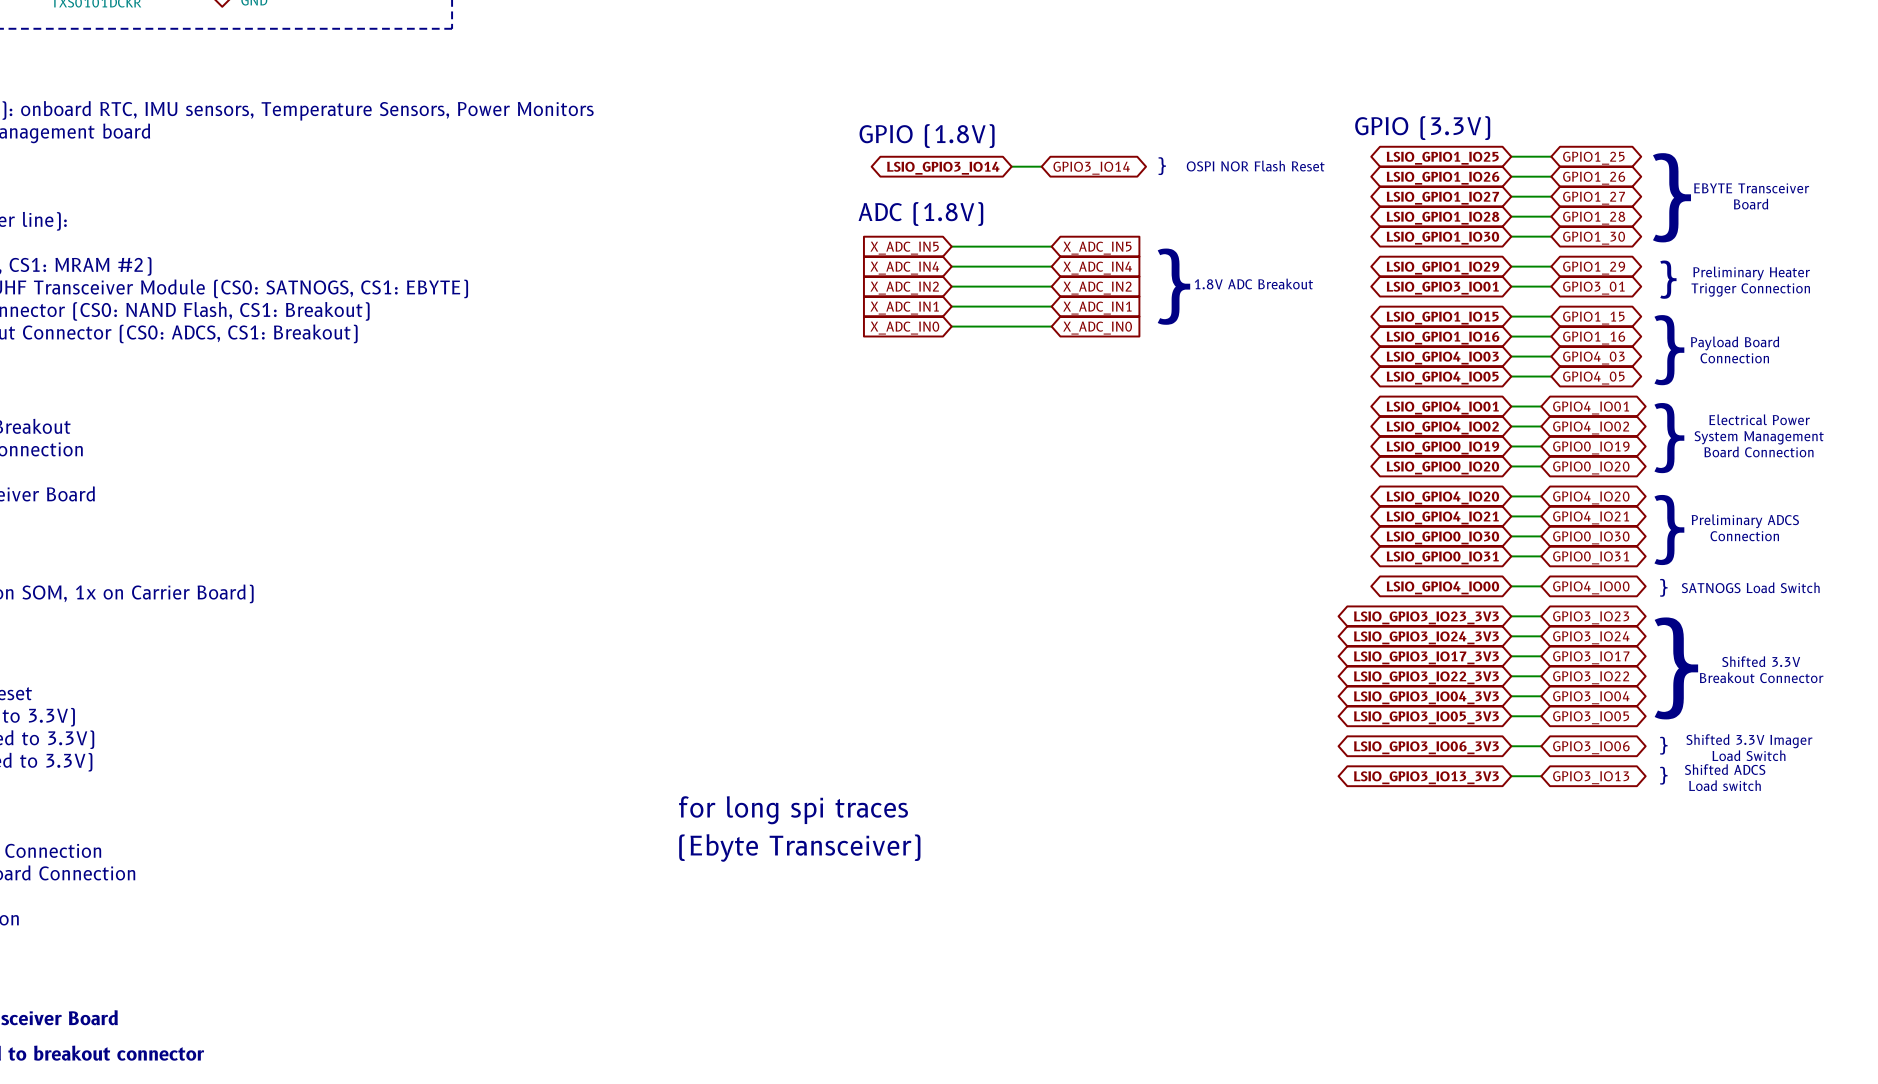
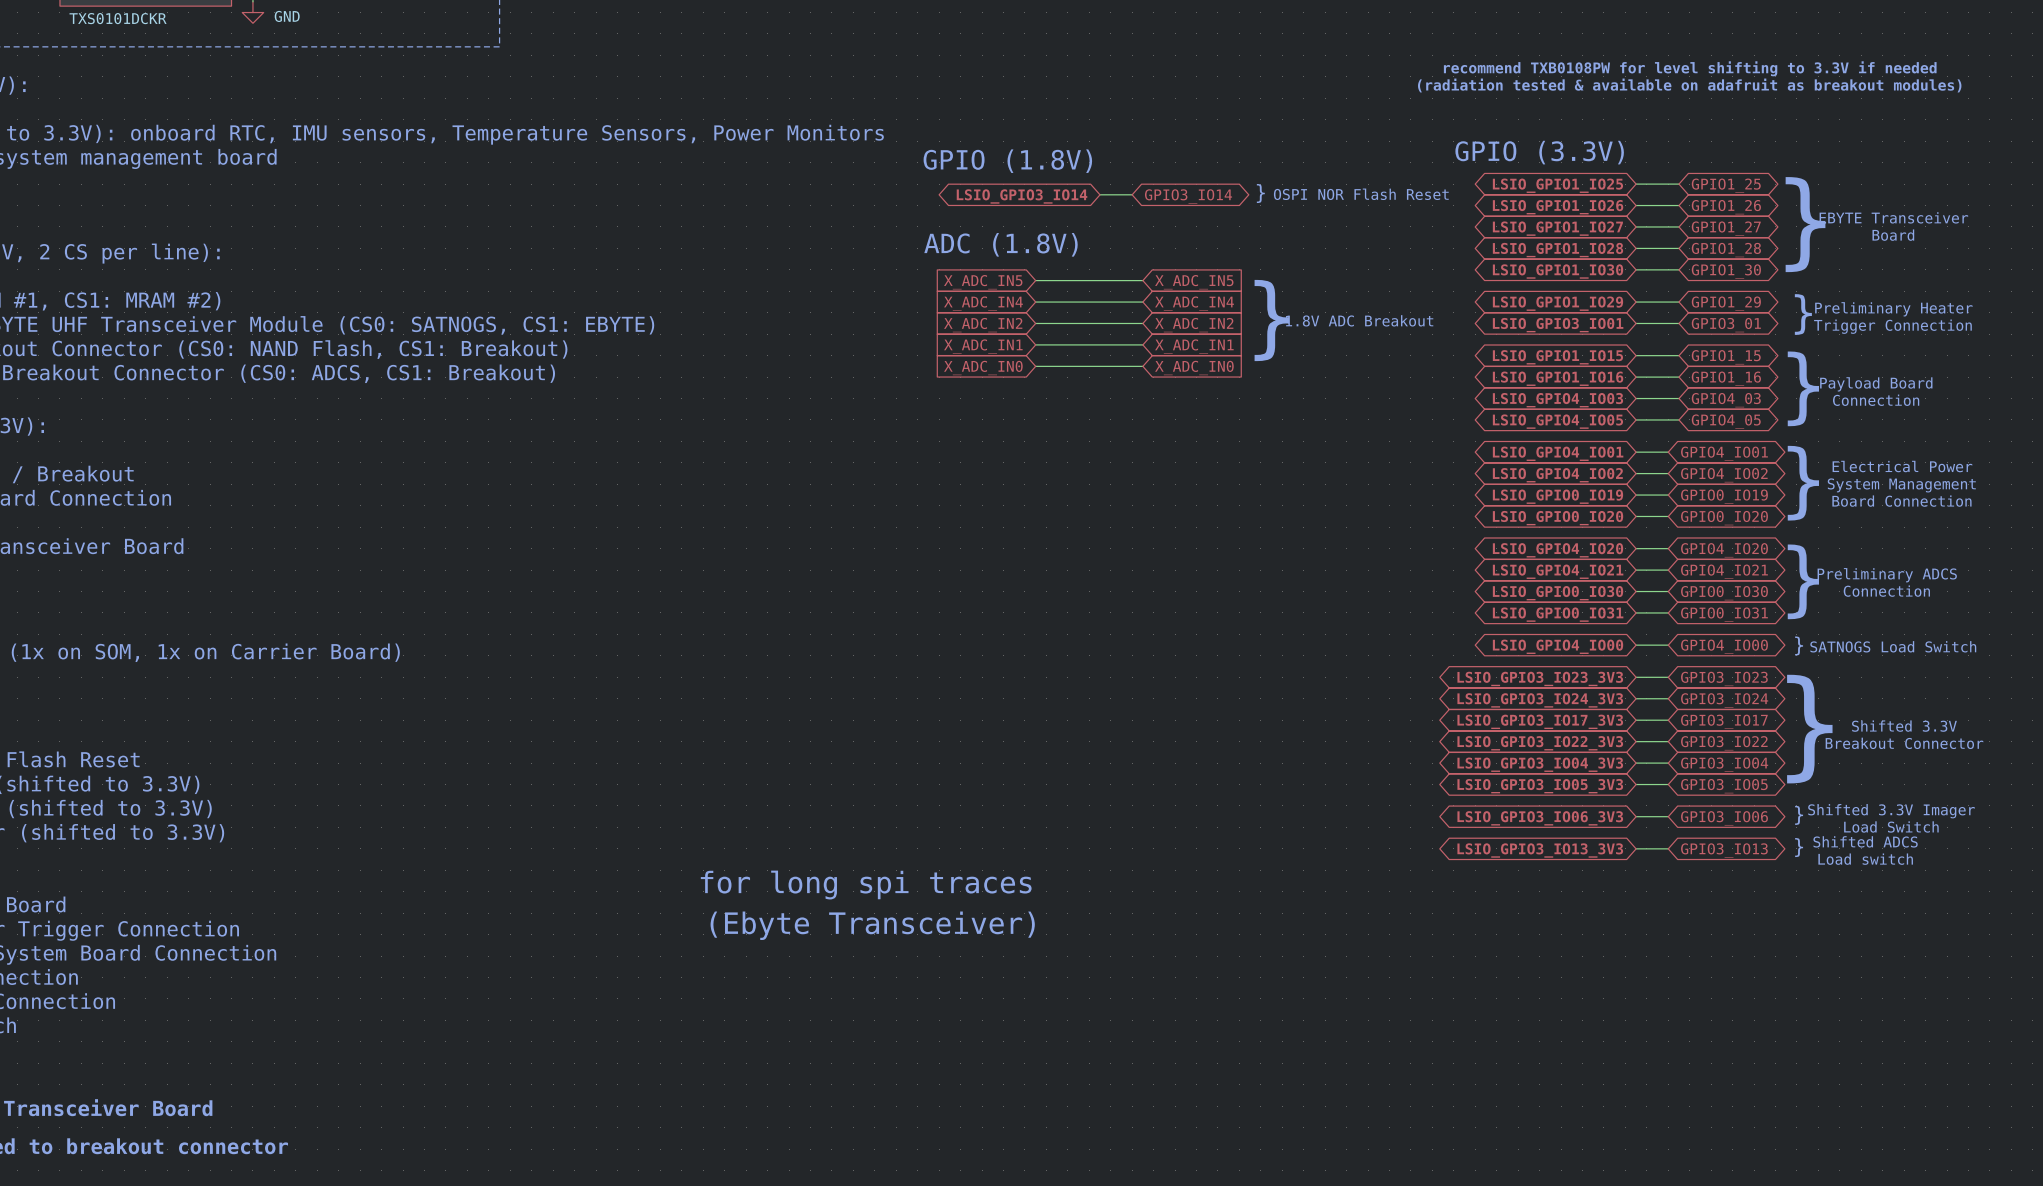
text: none -> recommend TXB0108PW for level shifting to 3.3V if needed (1690, 68)
text: none -> (radiation tested & available on adafruit as breakout modules) (1689, 85)

